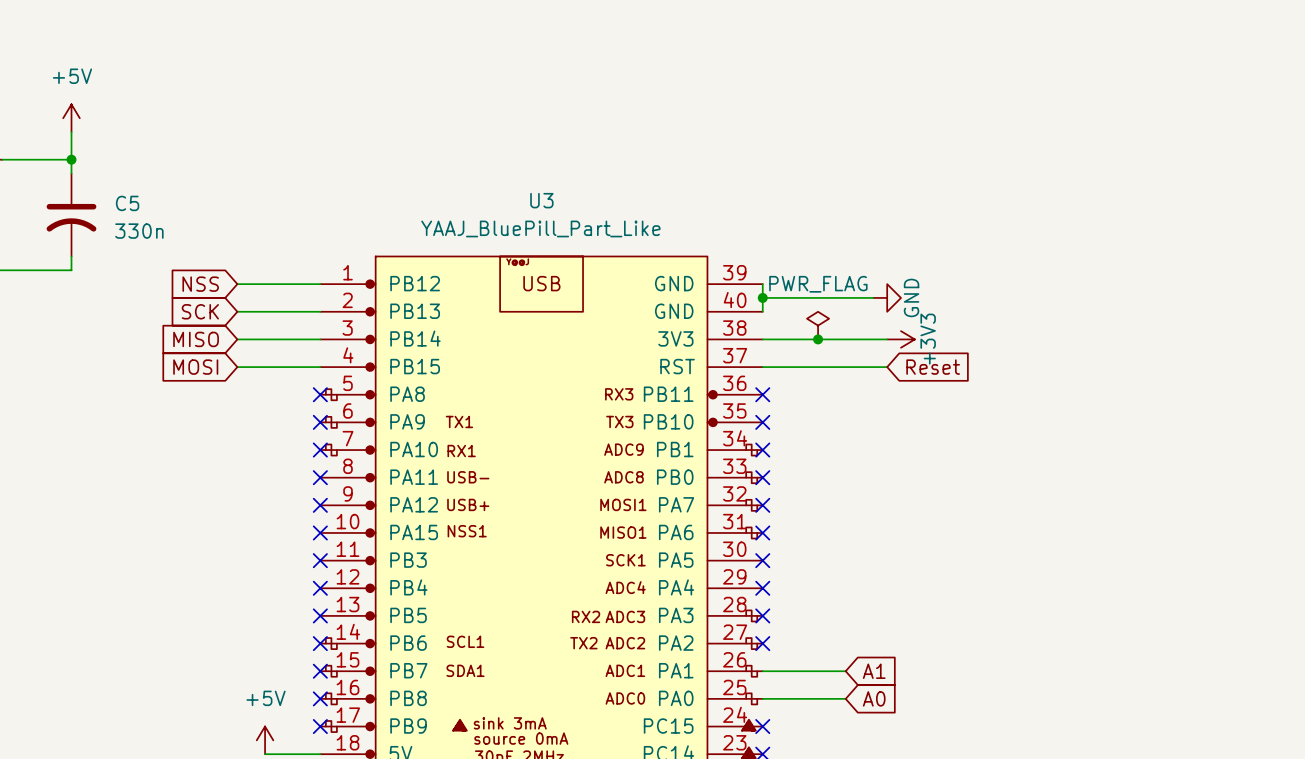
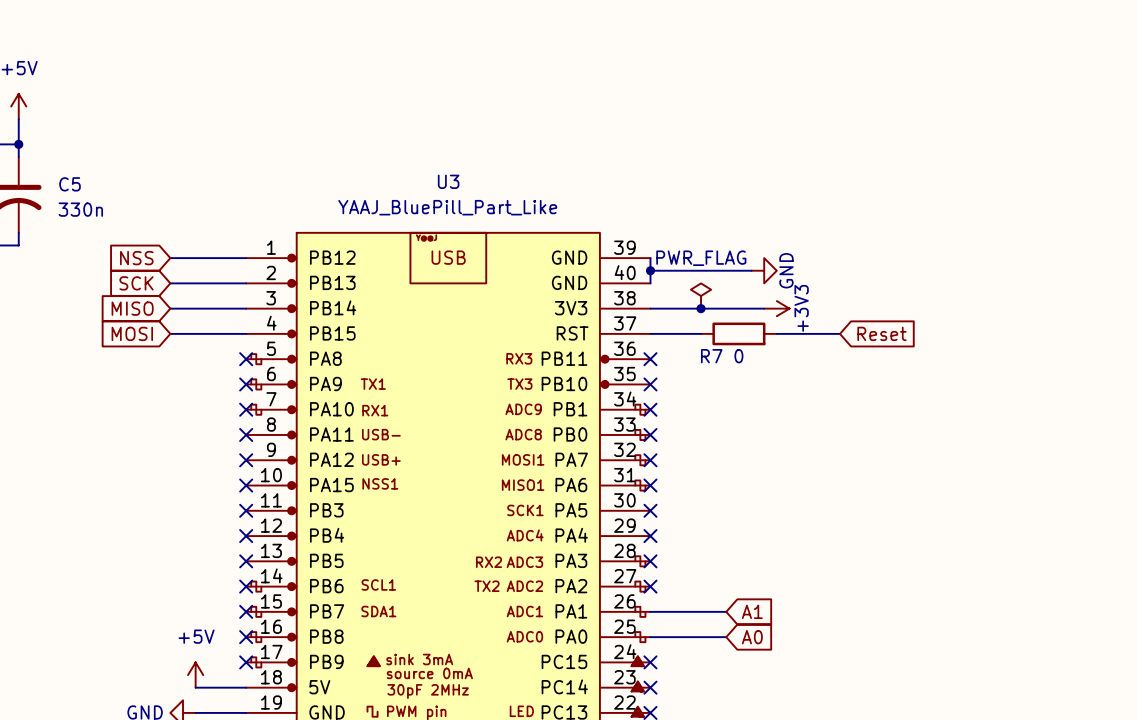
wire: (818, 367) (887, 367) -> (776, 333) (840, 333)
R7: none -> 0 (738, 333)
global label position: Reset (933, 367) -> Reset (881, 333)

